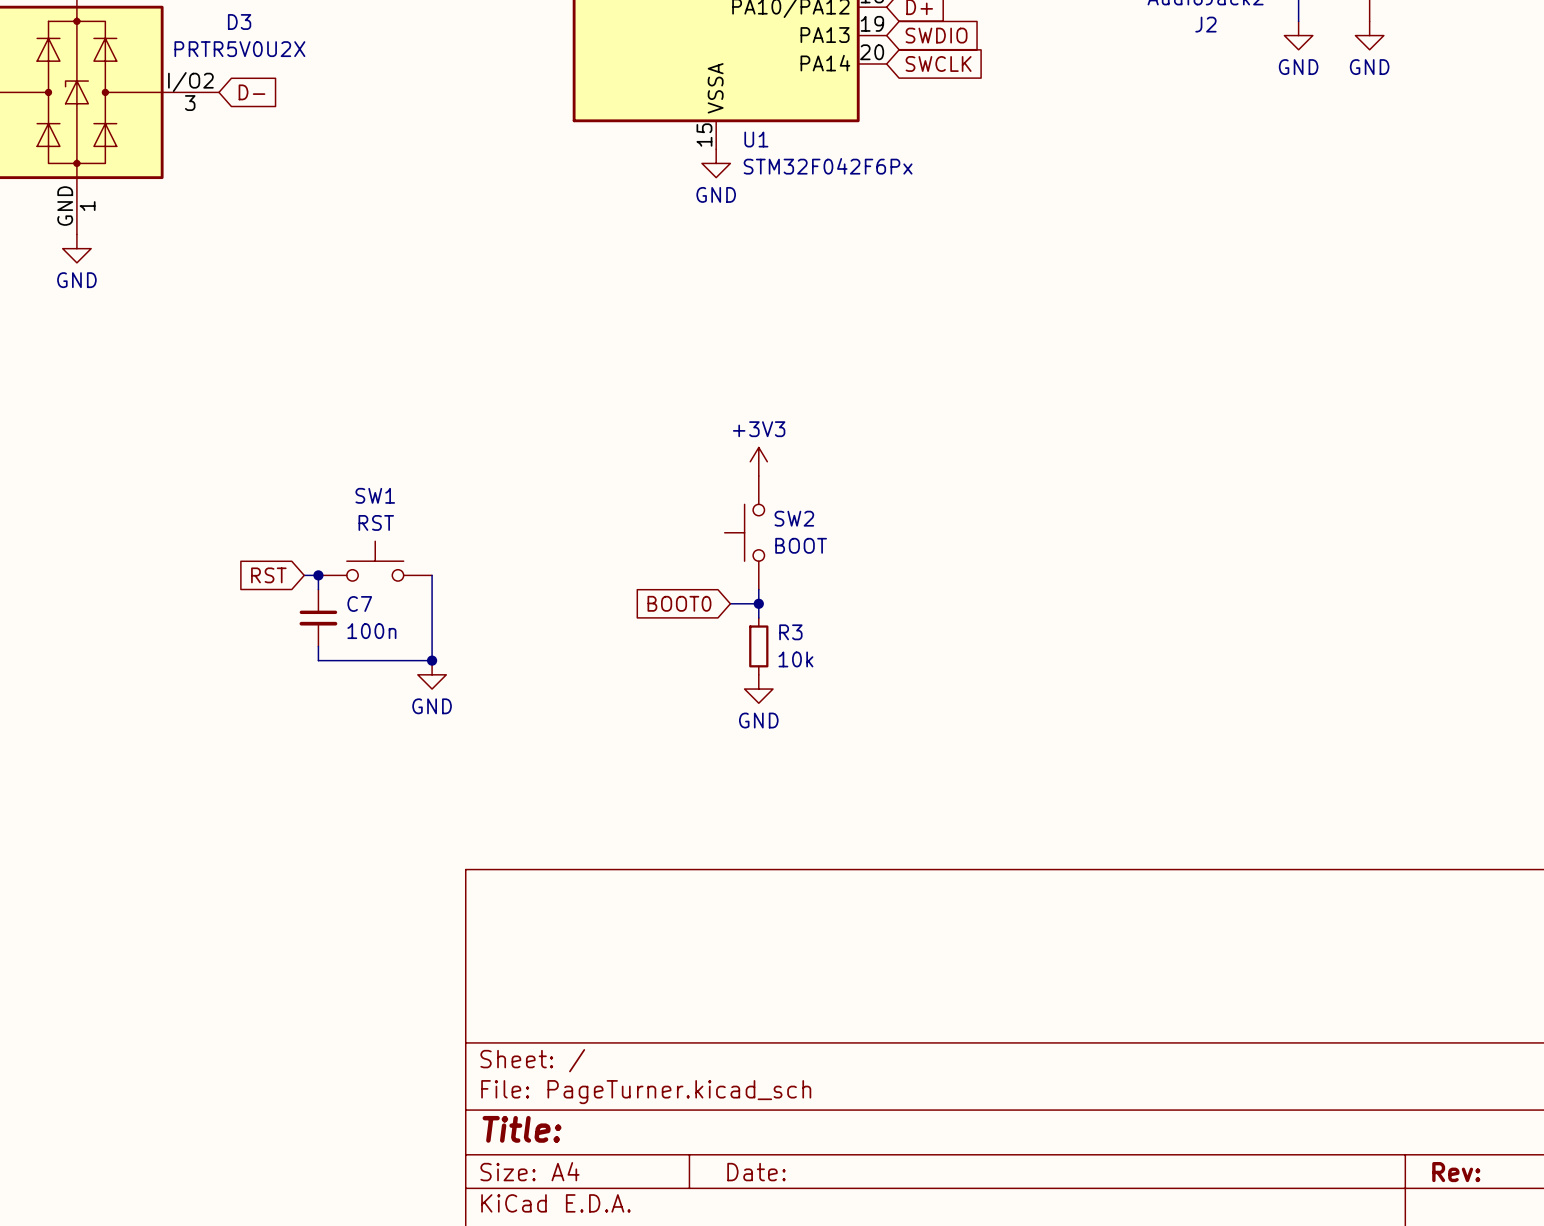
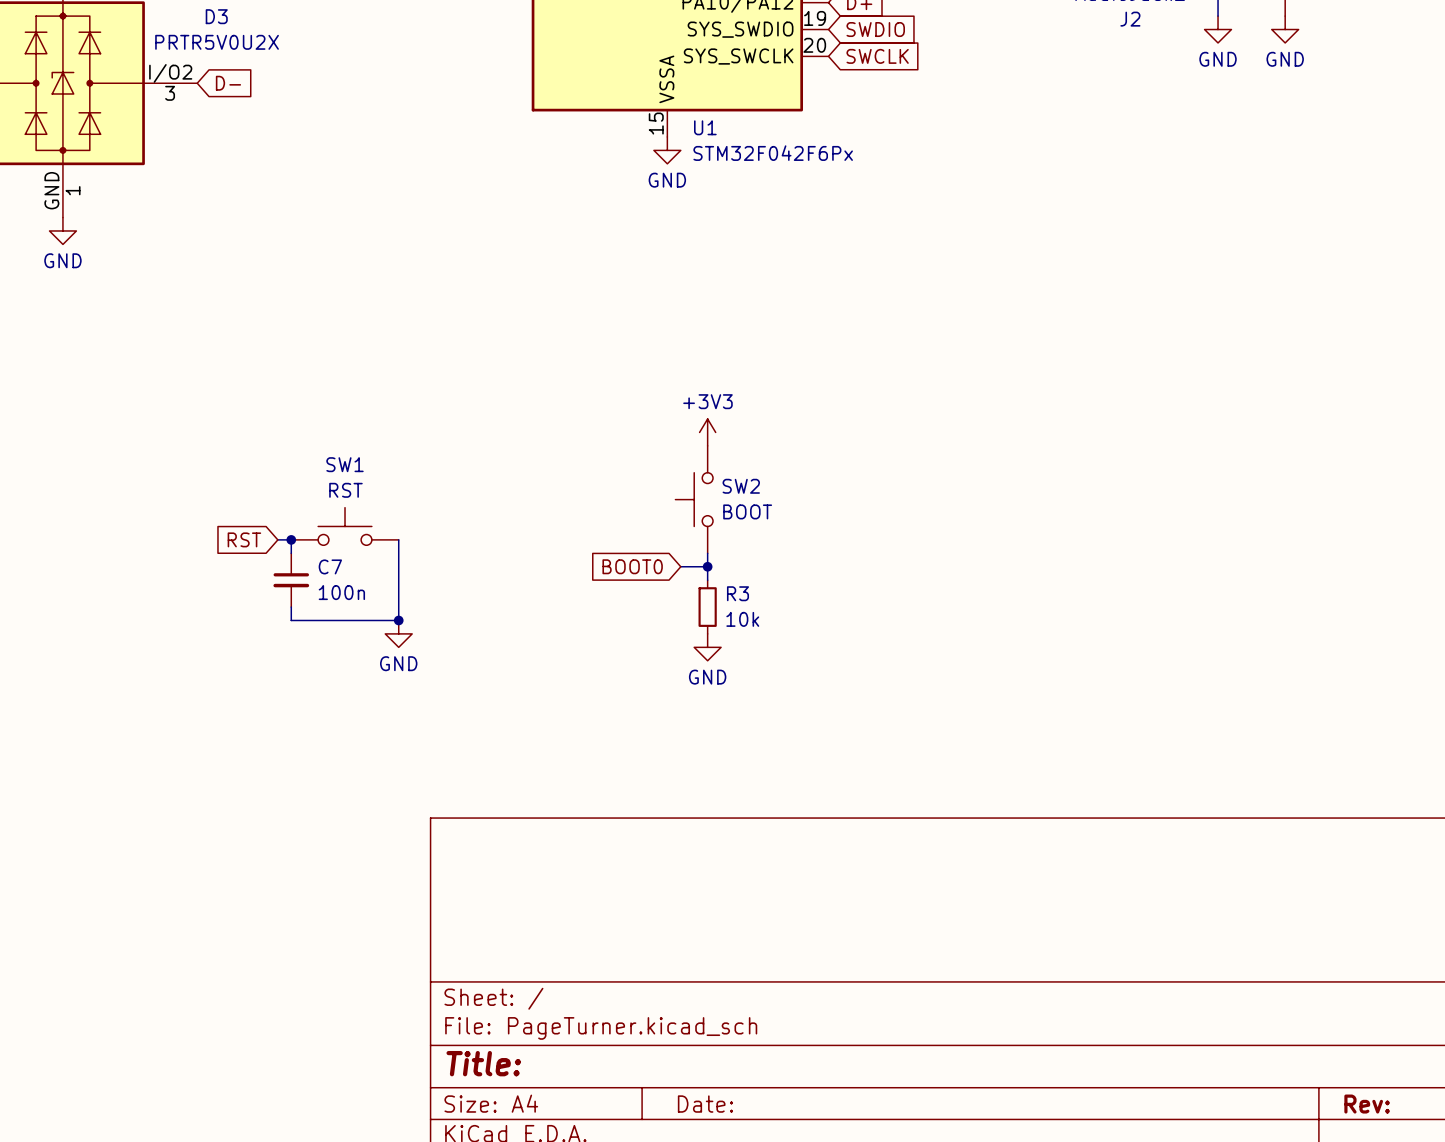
U1 pin name: PA13 (825, 35) -> SYS_SWDIO (740, 29)
U1 pin name: PA14 (825, 63) -> SYS_SWCLK (738, 56)

